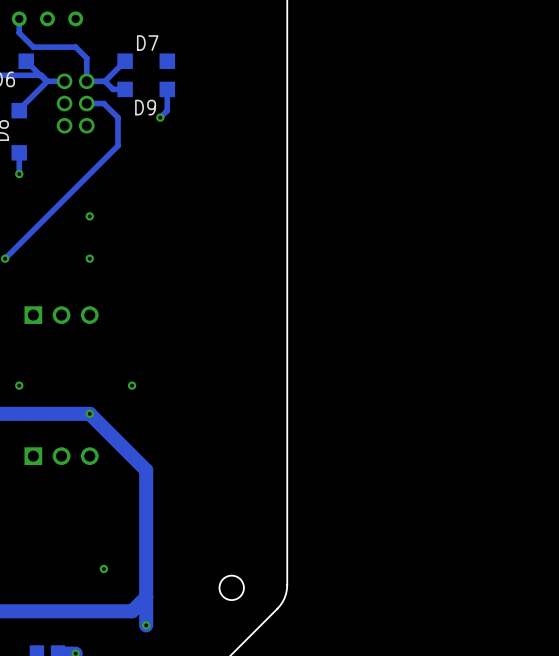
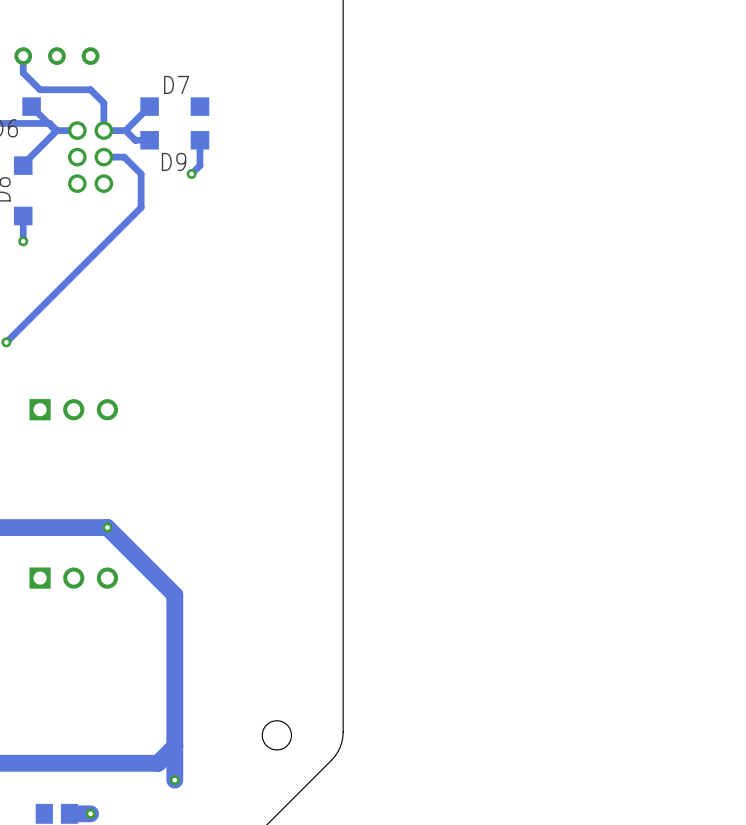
via: (89, 216) -> none
via: (89, 258) -> none
via: (19, 385) -> none
via: (132, 385) -> none
via: (103, 568) -> none

